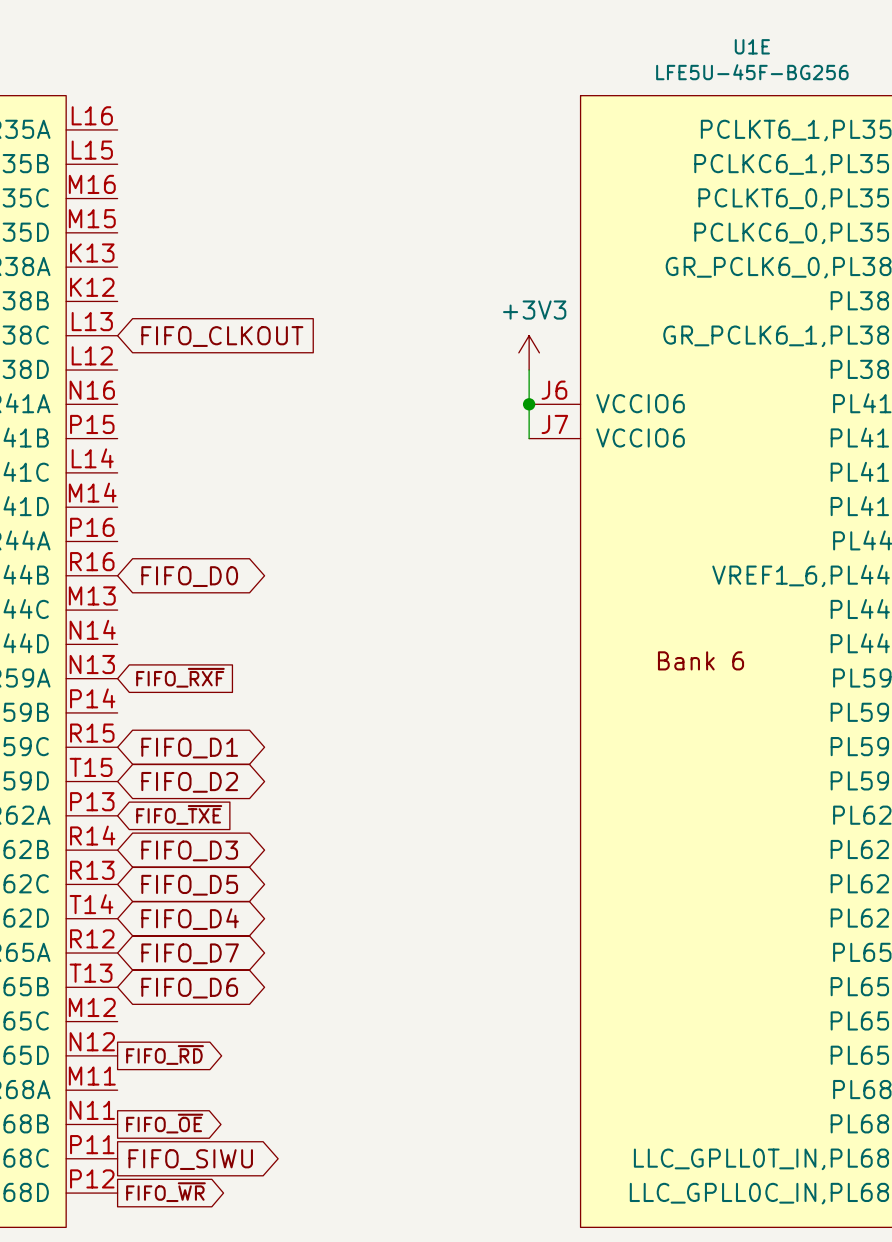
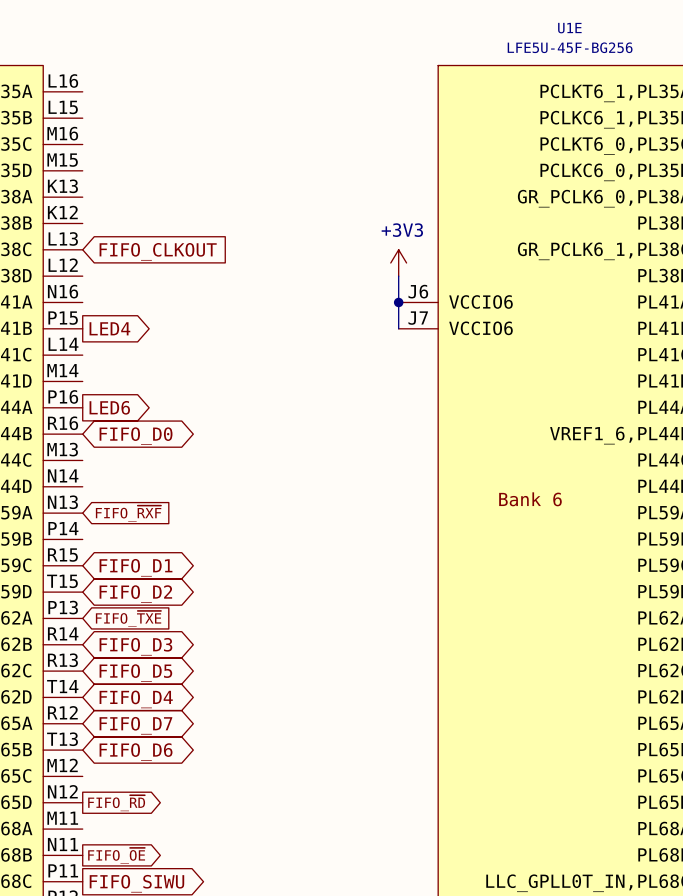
global label: none -> LED4 (109, 328)
global label: none -> LED6 (109, 407)

